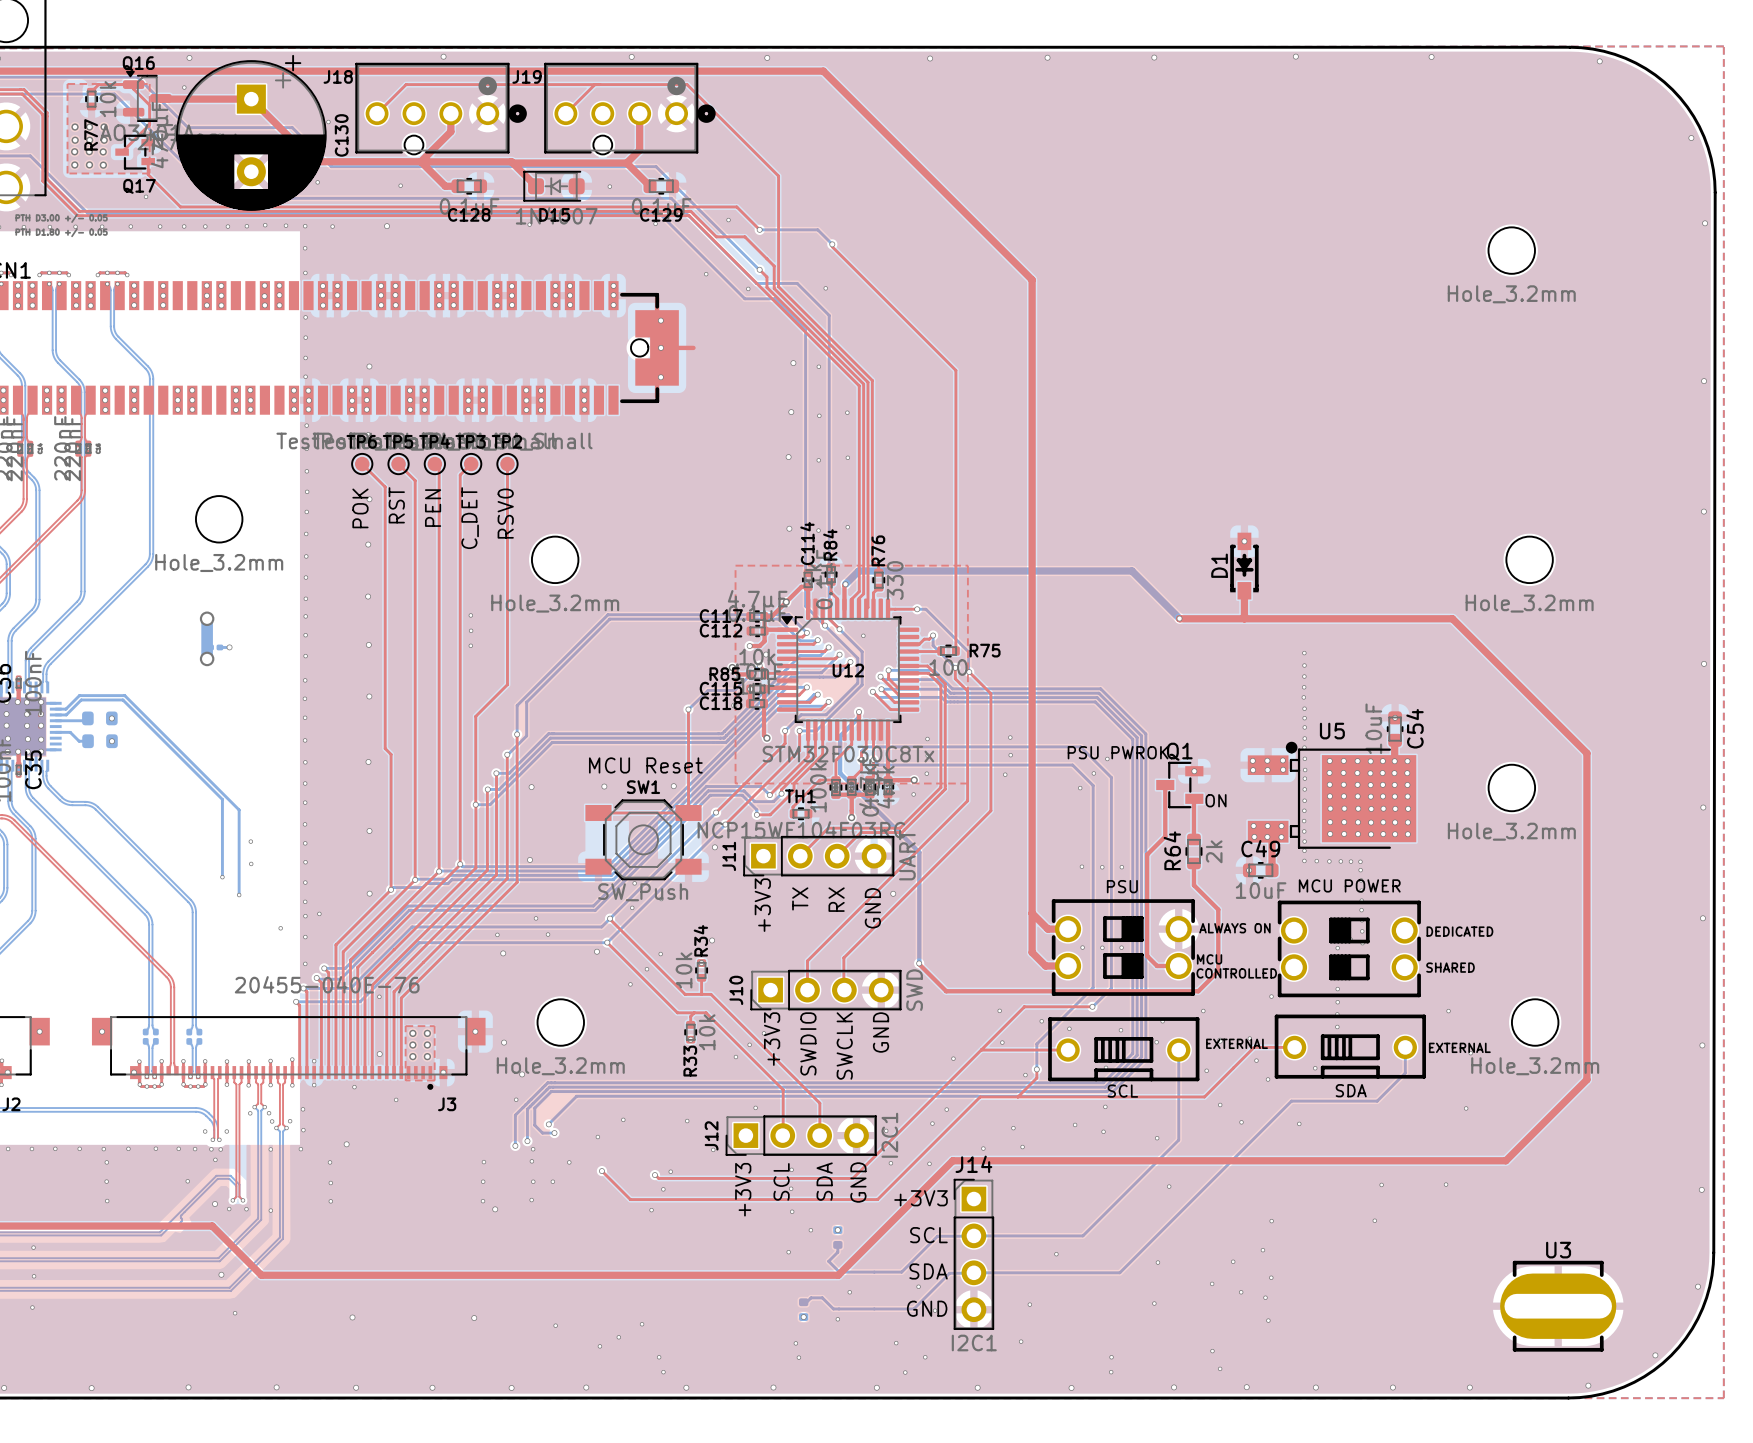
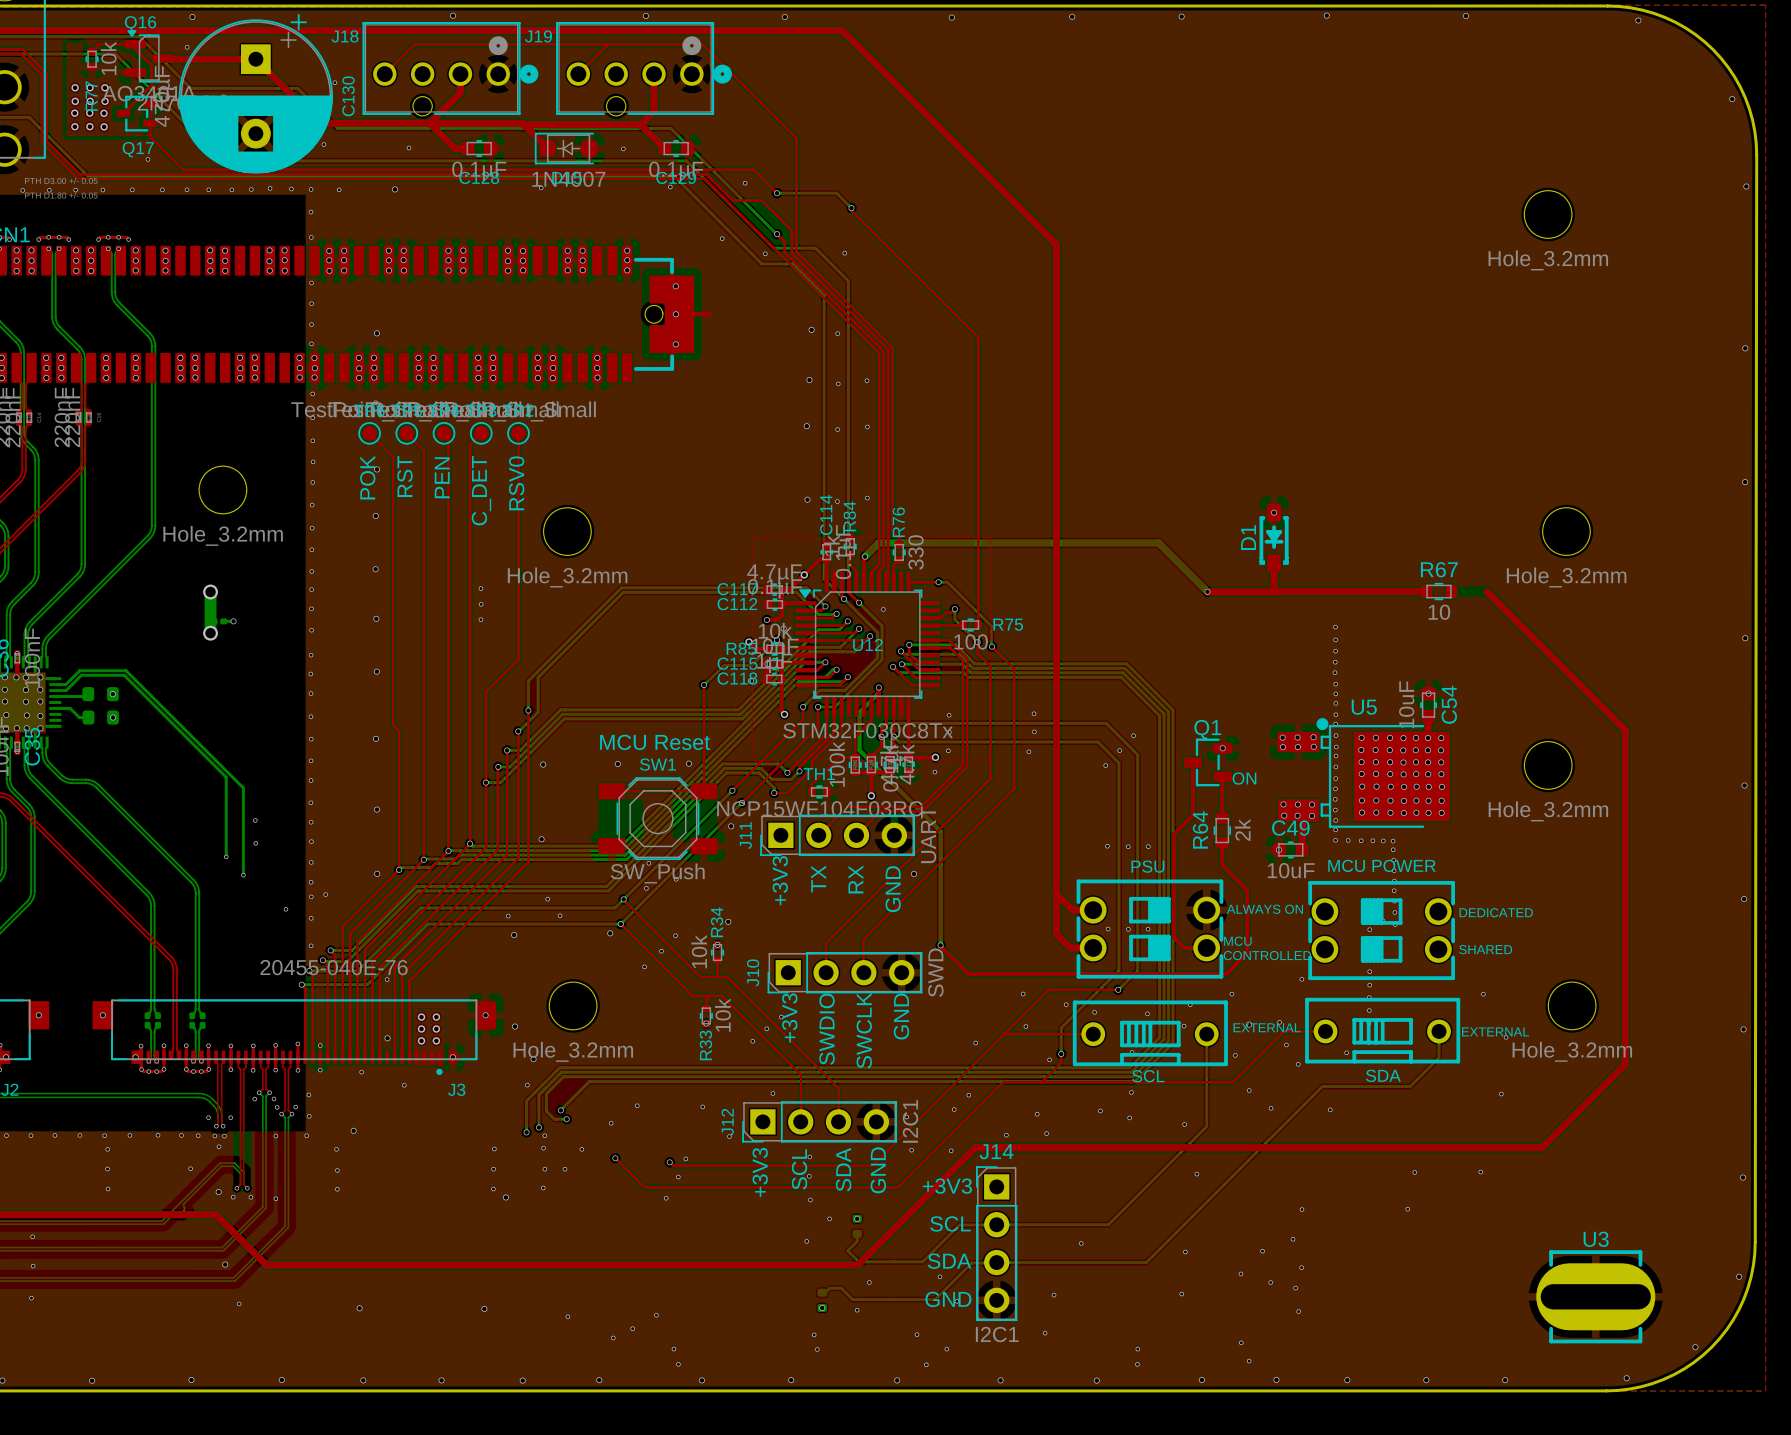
top track: (1244, 618) (1452, 618) -> (1274, 591) (1426, 591)
R67: none -> 10 (1438, 591)
text: PSU PWROK (1118, 752) -> none

